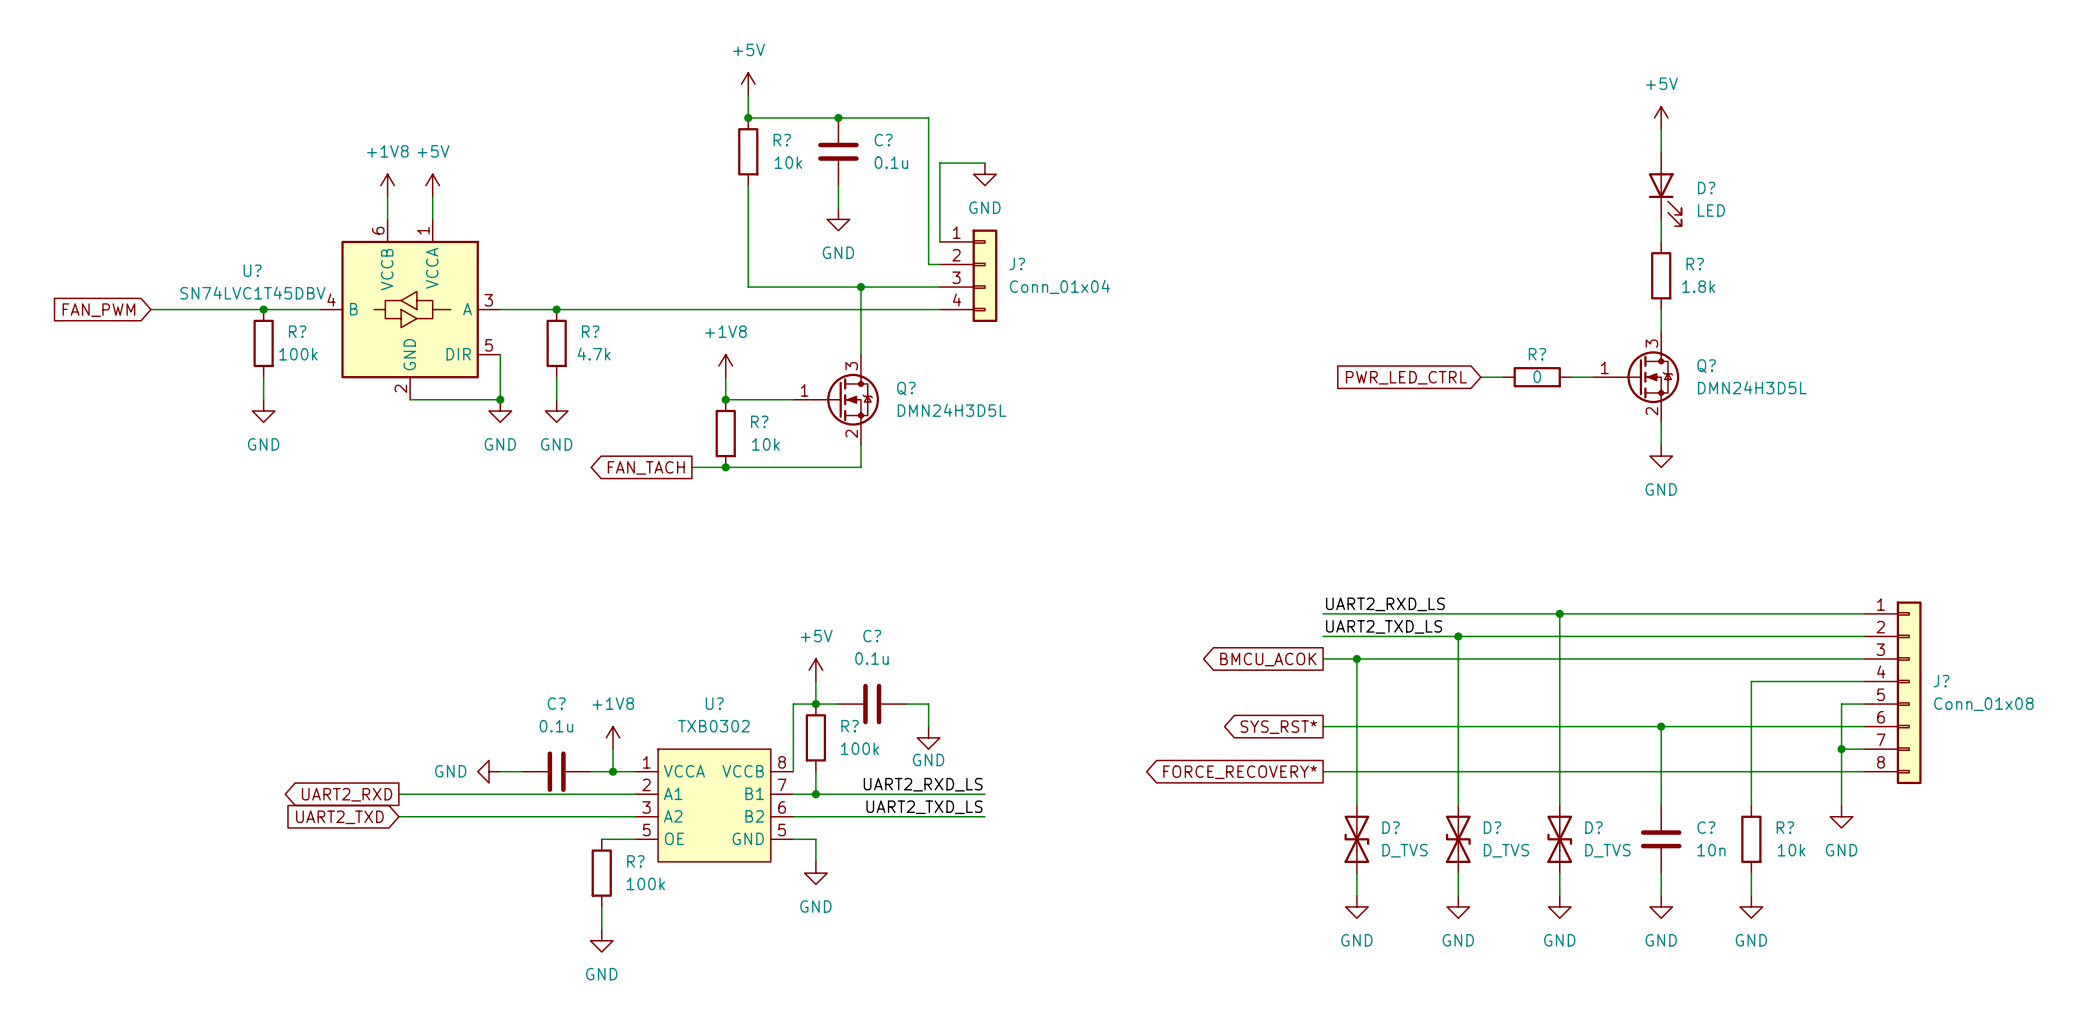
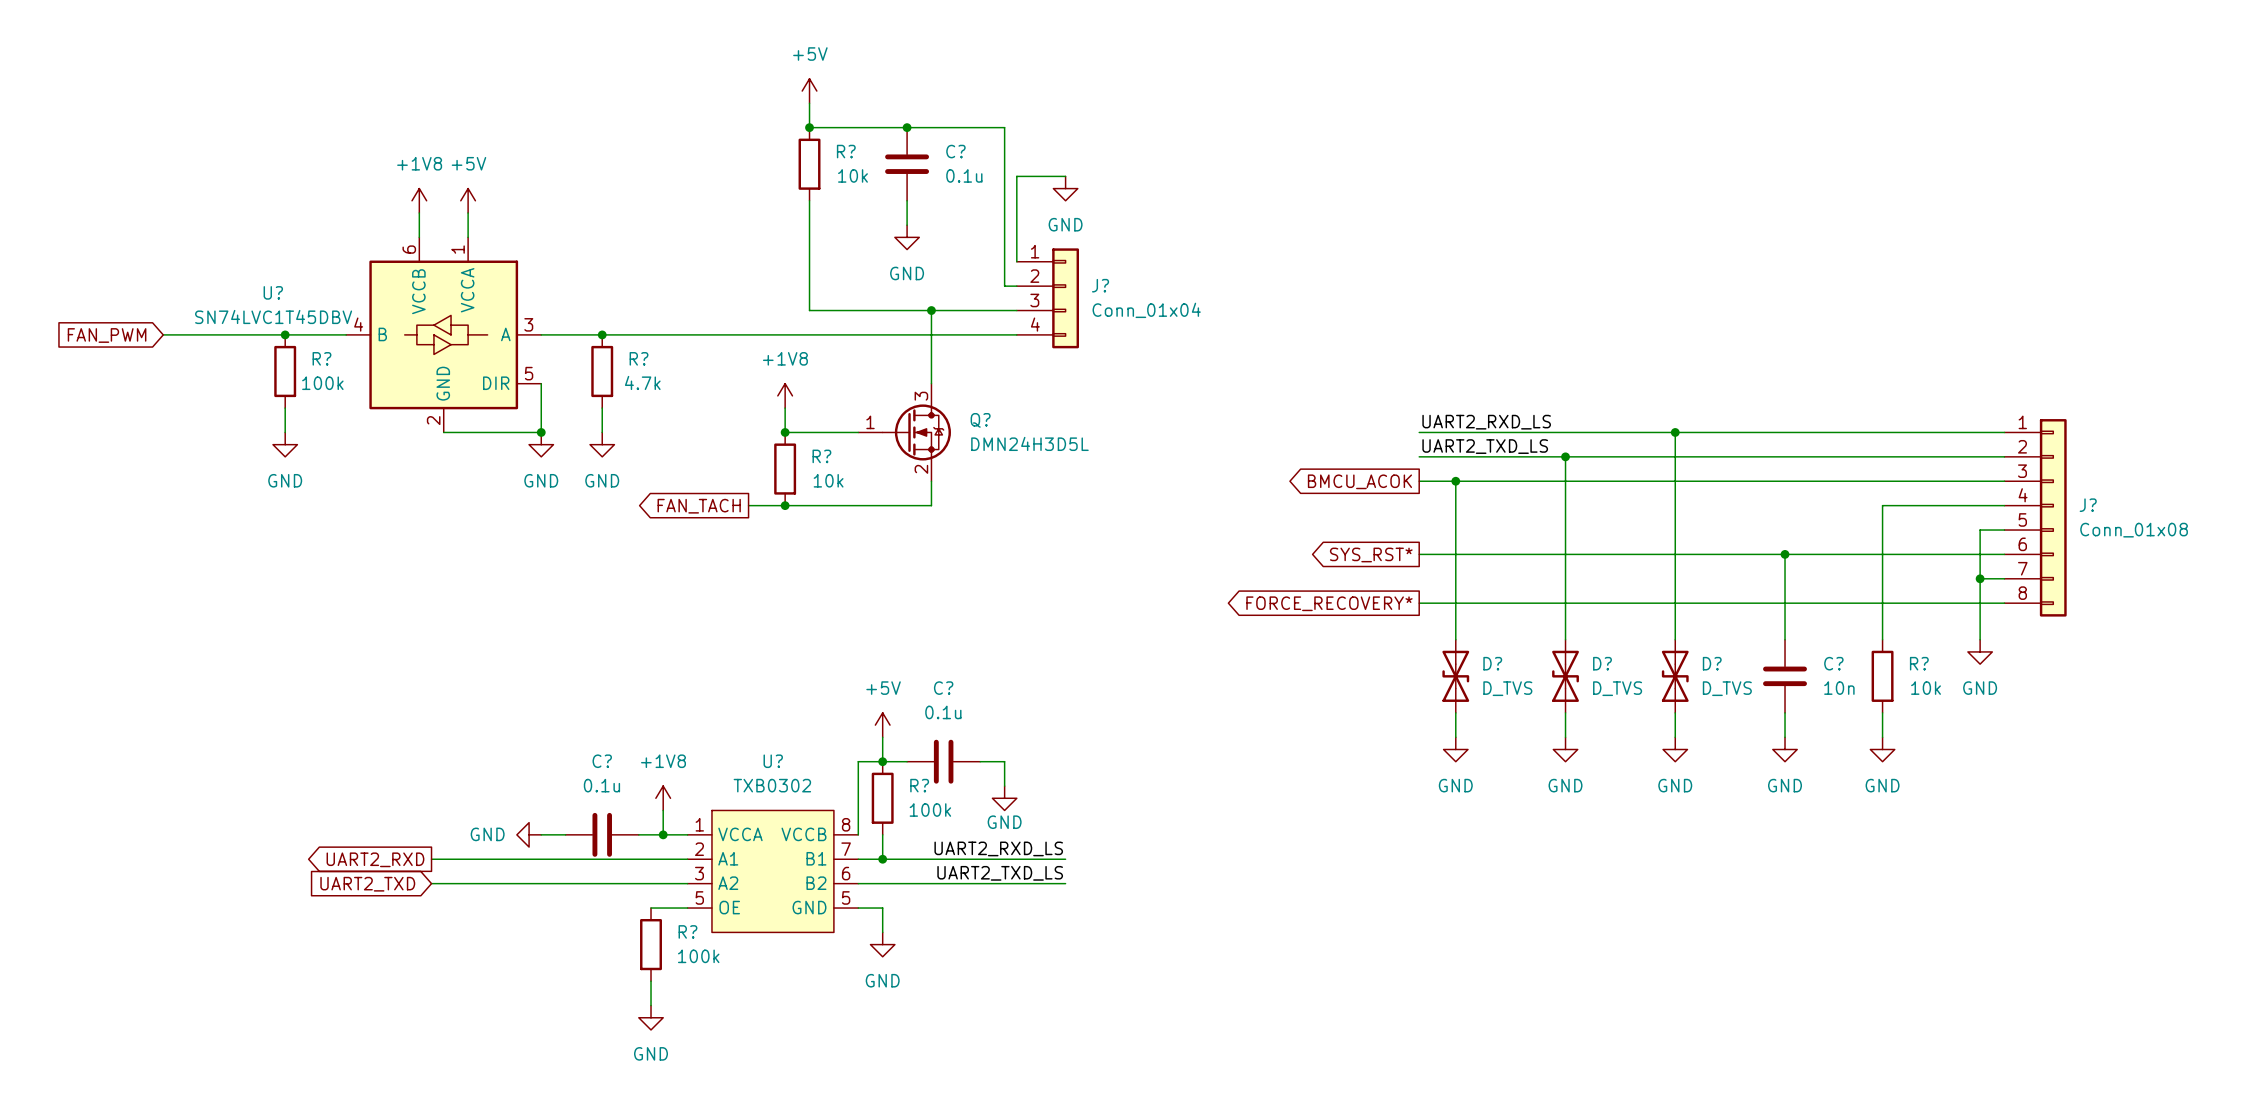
power symbol: +5V (1661, 117) -> none
wire: (1661, 129) (1661, 151) -> none
D?: LED (1665, 188) -> none
wire: (1661, 219) (1661, 241) -> none
R?: 1.8k (1661, 275) -> none
wire: (1661, 309) (1661, 332) -> none
global label: PWR_LED_CTRL (1406, 377) -> none
wire: (1480, 377) (1503, 377) -> none
R?: 0 (1537, 377) -> none
wire: (1571, 377) (1593, 377) -> none
Q?: DMN24H3D5L (1636, 377) -> none
junction: none -> (1675, 432)
junction: none -> (1565, 456)
wire: (1661, 422) (1661, 444) -> none
junction: none -> (1455, 481)
power symbol: GND (1661, 456) -> none
junction: none -> (1785, 554)
junction: none -> (1980, 578)
power symbol: none -> GND (1980, 651)
label position: UART2_RXD_LS (1385, 604) -> UART2_RXD_LS (1486, 422)
wire: (1323, 613) (1864, 613) -> (1419, 432) (2004, 432)
wire: (1559, 613) (1559, 805) -> (1675, 432) (1675, 639)
junction: (1559, 613) -> none
D?: none -> D_TVS (1455, 676)
D?: none -> D_TVS (1565, 676)
D?: none -> D_TVS (1675, 676)
label position: UART2_TXD_LS (1384, 626) -> UART2_TXD_LS (1485, 446)
wire: (1323, 636) (1864, 636) -> (1419, 456) (2004, 456)
wire: (1458, 636) (1458, 805) -> (1565, 456) (1565, 639)
junction: (1458, 636) -> none
wire: (1323, 658) (1864, 658) -> (1419, 481) (2004, 481)
wire: (1356, 658) (1356, 805) -> (1455, 481) (1455, 639)
junction: (1356, 658) -> none
global label position: BMCU_ACOK (1268, 659) -> BMCU_ACOK (1359, 481)
wire: (1864, 681) (1751, 681) (1751, 805) -> (2004, 505) (1882, 505) (1882, 639)
power symbol: none -> GND (1455, 749)
power symbol: none -> GND (1565, 749)
power symbol: none -> GND (1675, 749)
power symbol: none -> GND (1785, 749)
power symbol: none -> GND (1882, 749)
J? position: (1892, 692) -> (2035, 517)
wire: (1864, 704) (1841, 704) (1841, 805) -> (2004, 530) (1980, 530) (1980, 639)
wire: (1323, 726) (1864, 726) -> (1419, 554) (2004, 554)
wire: (1661, 726) (1661, 805) -> (1785, 554) (1785, 639)
junction: (1661, 726) -> none
global label position: SYS_RST* (1278, 727) -> SYS_RST* (1371, 554)
wire: (1841, 749) (1864, 749) -> (1980, 578) (2004, 578)
junction: (1841, 749) -> none
wire: (1323, 771) (1864, 771) -> (1419, 603) (2004, 603)
global label position: FORCE_RECOVERY* (1240, 772) -> FORCE_RECOVERY* (1329, 603)
power symbol: GND (1841, 816) -> none
D?: D_TVS (1356, 839) -> none
D?: D_TVS (1458, 839) -> none
D?: D_TVS (1559, 839) -> none
C? position: (1661, 839) -> (1785, 676)
R? position: (1751, 839) -> (1882, 676)
wire: (1356, 873) (1356, 895) -> (1455, 712) (1455, 737)
wire: (1458, 873) (1458, 895) -> (1565, 712) (1565, 737)
wire: (1559, 873) (1559, 895) -> (1675, 712) (1675, 737)
wire: (1661, 873) (1661, 895) -> (1785, 712) (1785, 737)
wire: (1751, 873) (1751, 895) -> (1882, 712) (1882, 737)
power symbol: GND (1356, 906) -> none
power symbol: GND (1458, 906) -> none
power symbol: GND (1559, 906) -> none
power symbol: GND (1661, 906) -> none
power symbol: GND (1751, 906) -> none

